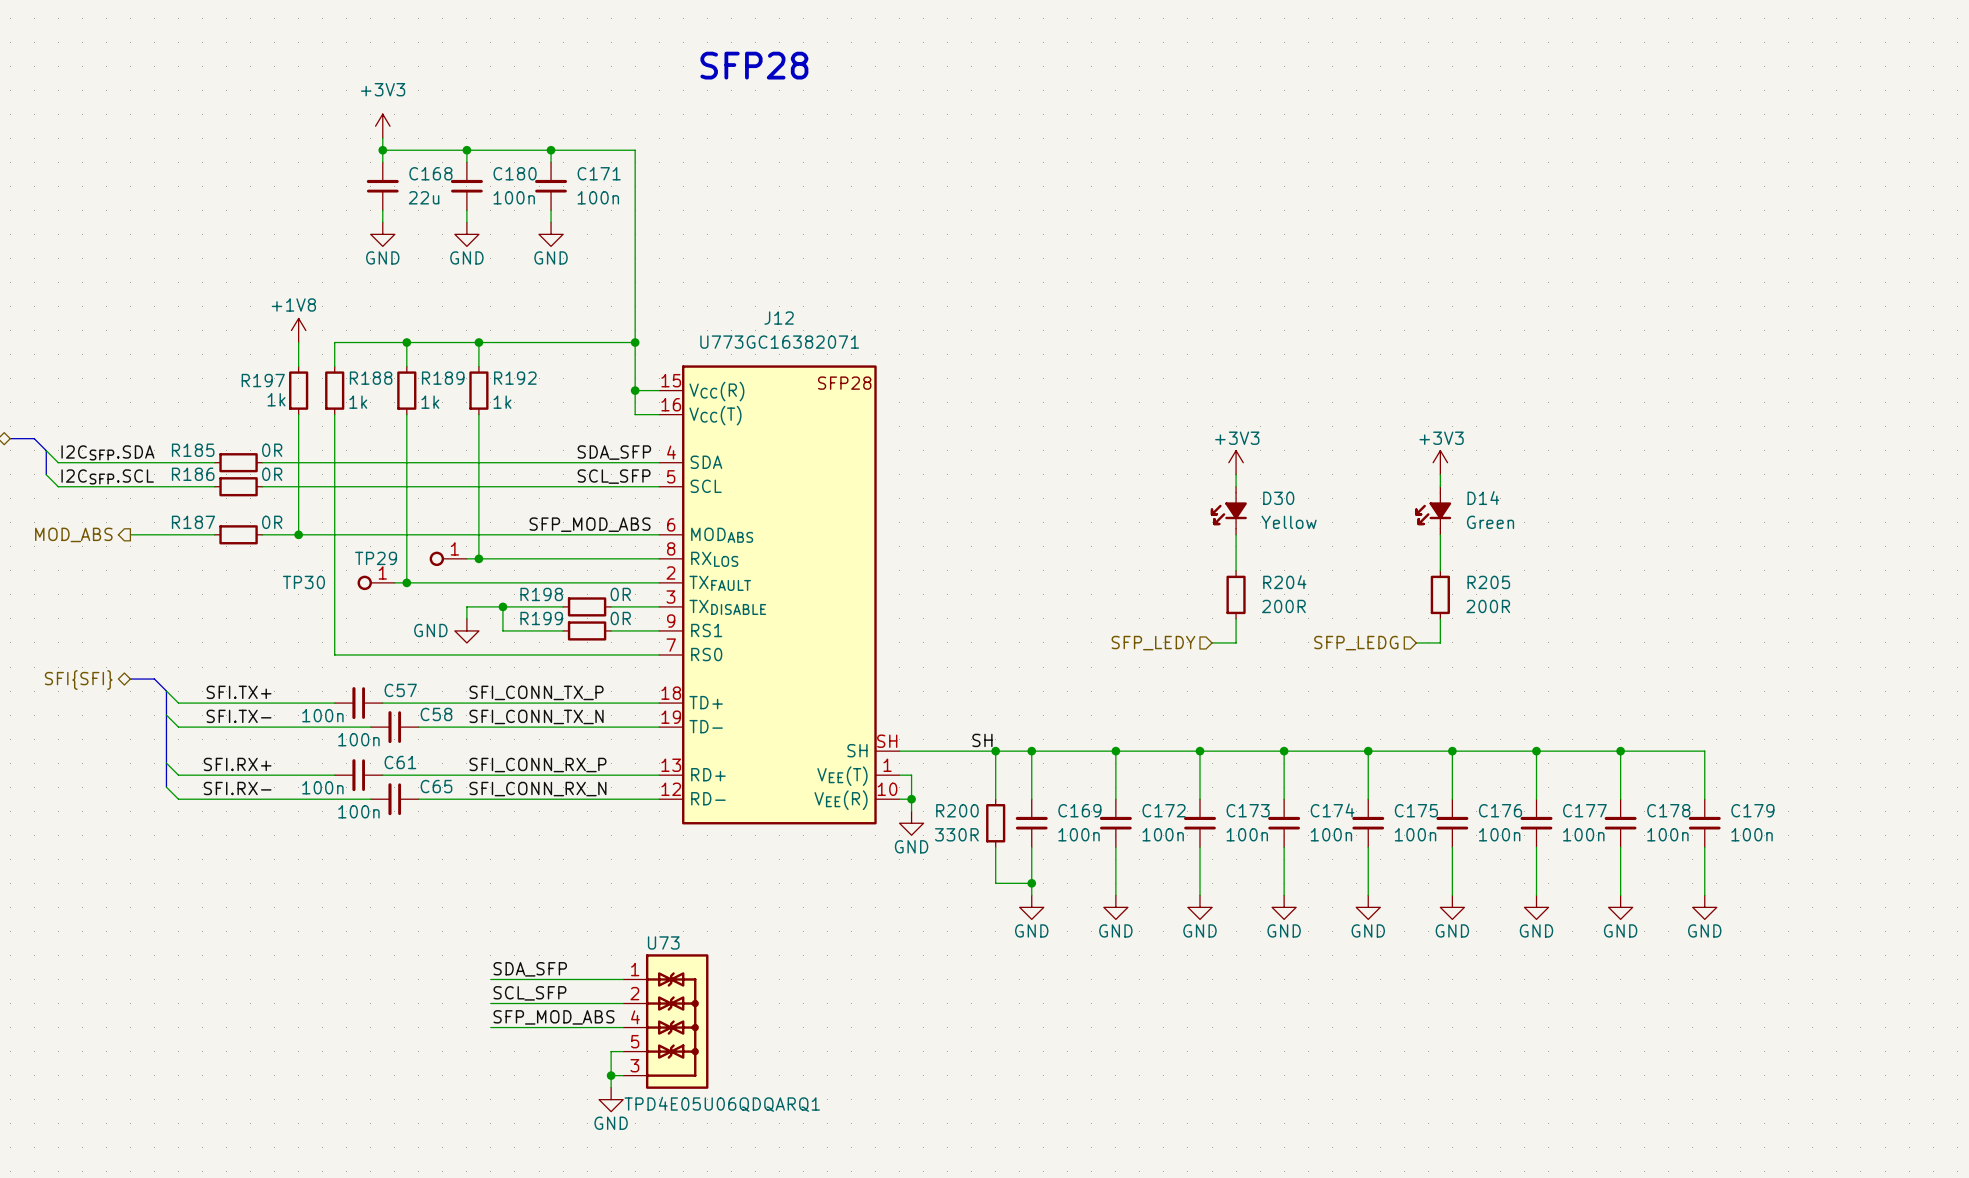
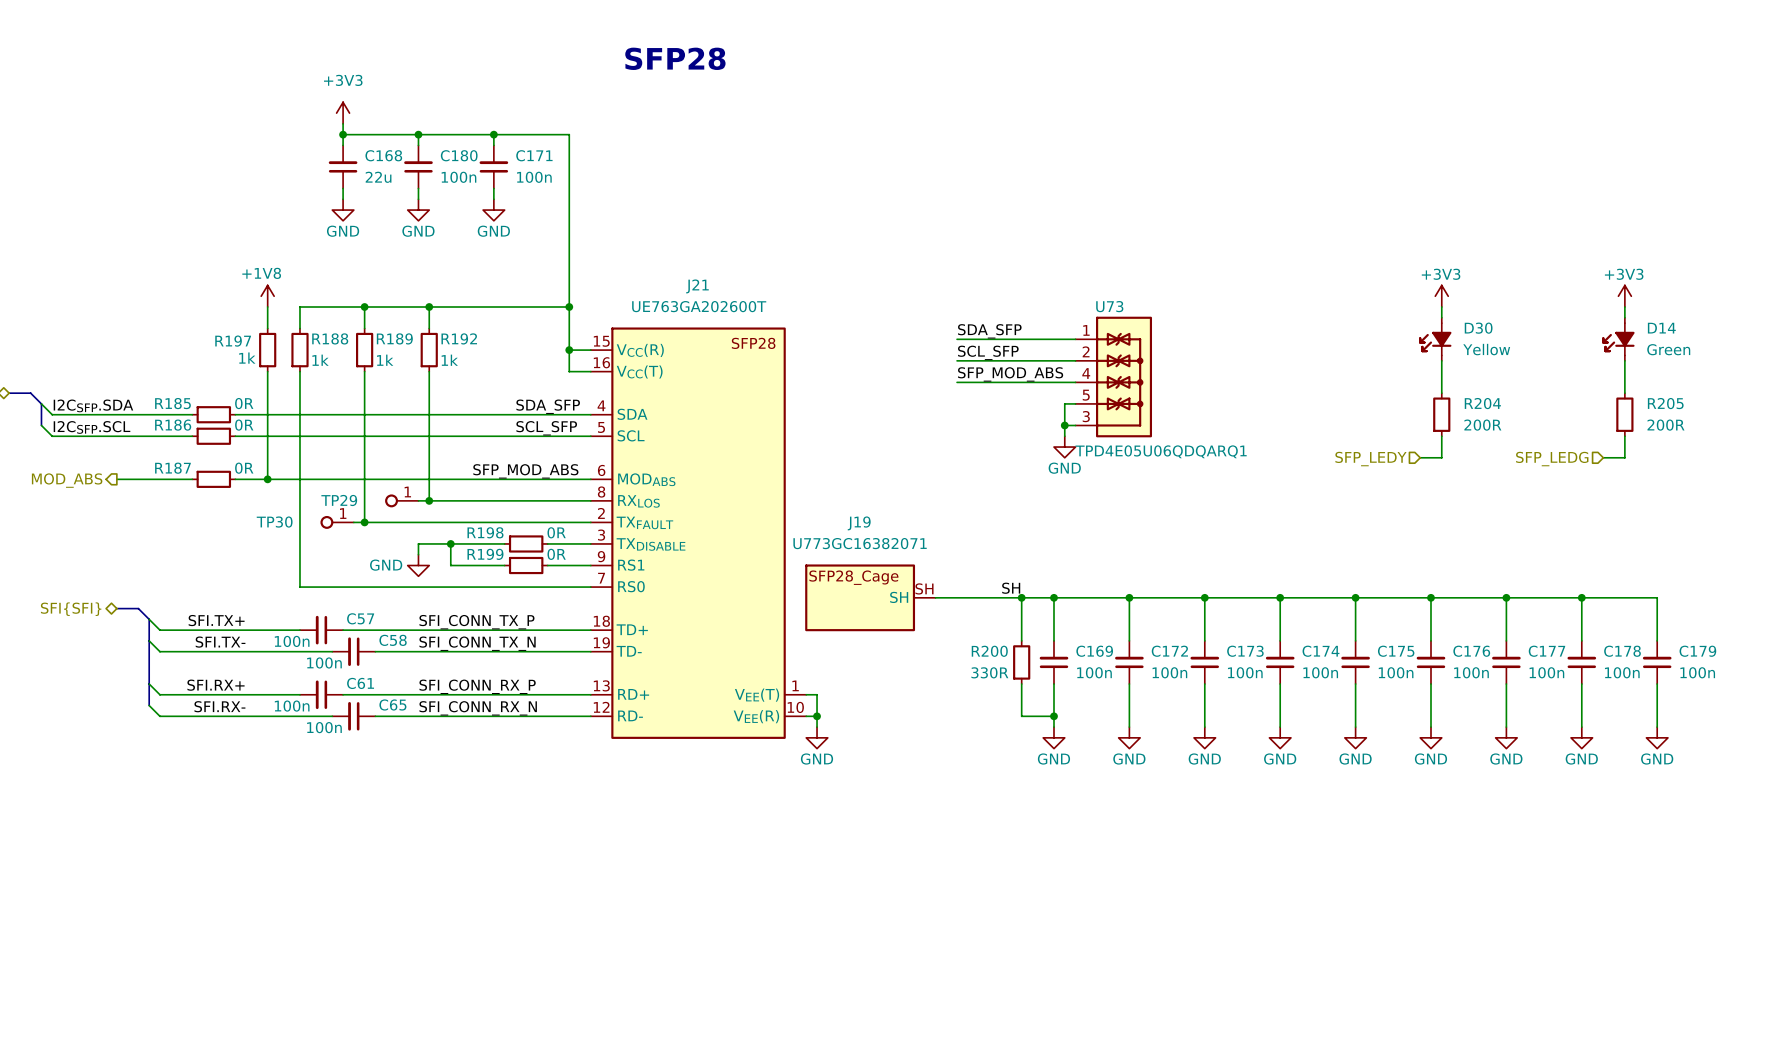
power symbol: none -> +3V3 (1441, 296)
power symbol: none -> +3V3 (1624, 296)
wire: none -> (1624, 307) (1624, 317)
label: none -> SDA_SFP (989, 331)
wire: none -> (957, 339) (1075, 339)
label: none -> SCL_SFP (988, 352)
wire: none -> (957, 360) (1075, 360)
wire: none -> (1624, 360) (1624, 393)
label: none -> SFP_MOD_ABS (1010, 374)
wire: none -> (957, 382) (1075, 382)
wire: none -> (1075, 403) (1064, 403) (1064, 436)
power symbol: +3V3 (1236, 462) -> none
power symbol: +3V3 (1440, 462) -> none
wire: none -> (1064, 425) (1075, 425)
junction: none -> (1064, 425)
wire: (1440, 474) (1440, 486) -> (1441, 307) (1441, 317)
wire: none -> (1624, 436) (1624, 457) (1603, 457)
power symbol: none -> GND (1064, 447)
D30 position: (1228, 510) -> (1435, 339)
D14 position: (1433, 510) -> (1618, 339)
hierarchical label: none -> SFP_LEDY (1370, 459)
hierarchical label: none -> SFP_LEDG (1552, 459)
wire: (1236, 534) (1236, 570) -> none
wire: (1440, 534) (1440, 570) -> (1441, 360) (1441, 393)
J12: (779, 594) -> none
J21: none -> (698, 533)
R204 position: (1236, 594) -> (1441, 414)
R205 position: (1440, 594) -> (1624, 414)
wire: (1236, 618) (1236, 642) (1212, 642) -> none
wire: (1440, 618) (1440, 642) (1416, 642) -> (1441, 436) (1441, 457) (1420, 457)
hierarchical label: SFP_LEDY (1153, 643) -> none
hierarchical label: SFP_LEDG (1356, 643) -> none
J19: none -> (870, 597)
junction: none -> (1021, 597)
junction: none -> (1053, 597)
junction: none -> (1129, 597)
junction: none -> (1204, 597)
junction: none -> (1280, 597)
junction: none -> (1355, 597)
junction: none -> (1430, 597)
junction: none -> (1506, 597)
junction: none -> (1581, 597)
label position: SH (982, 740) -> SH (1011, 588)
wire: (899, 751) (1704, 751) (1704, 799) -> (935, 597) (1657, 597) (1657, 640)
wire: (995, 751) (995, 799) -> (1021, 597) (1021, 640)
junction: (995, 751) -> none
wire: (1031, 751) (1031, 799) -> (1053, 597) (1053, 640)
junction: (1031, 751) -> none
wire: (1115, 751) (1115, 799) -> (1129, 597) (1129, 640)
junction: (1115, 751) -> none
wire: (1200, 751) (1200, 799) -> (1204, 597) (1204, 640)
junction: (1200, 751) -> none
wire: (1284, 751) (1284, 799) -> (1280, 597) (1280, 640)
junction: (1284, 751) -> none
wire: (1368, 751) (1368, 799) -> (1355, 597) (1355, 640)
junction: (1368, 751) -> none
wire: (1452, 751) (1452, 799) -> (1430, 597) (1430, 640)
junction: (1452, 751) -> none
wire: (1536, 751) (1536, 799) -> (1506, 597) (1506, 640)
junction: (1536, 751) -> none
wire: (1620, 751) (1620, 799) -> (1581, 597) (1581, 640)
junction: (1620, 751) -> none
junction: none -> (1053, 716)
R200 position: (995, 823) -> (1021, 662)
C169 position: (1031, 823) -> (1053, 662)
C172 position: (1115, 823) -> (1129, 662)
power symbol: none -> GND (1053, 737)
C173 position: (1200, 823) -> (1204, 662)
power symbol: none -> GND (1129, 737)
C174 position: (1284, 823) -> (1280, 662)
power symbol: none -> GND (1204, 737)
C175 position: (1368, 823) -> (1355, 662)
power symbol: none -> GND (1280, 737)
C176 position: (1452, 823) -> (1430, 662)
power symbol: none -> GND (1355, 737)
C177 position: (1536, 823) -> (1506, 662)
power symbol: none -> GND (1430, 737)
C178 position: (1620, 823) -> (1581, 662)
power symbol: none -> GND (1506, 737)
C179 position: (1704, 823) -> (1657, 662)
power symbol: none -> GND (1581, 737)
power symbol: none -> GND (1657, 737)
wire: (995, 847) (995, 883) (1031, 883) -> (1021, 684) (1021, 716) (1053, 716)
wire: (1031, 847) (1031, 895) -> (1053, 684) (1053, 727)
wire: (1115, 847) (1115, 895) -> (1129, 684) (1129, 727)
wire: (1200, 847) (1200, 895) -> (1204, 684) (1204, 727)
wire: (1284, 847) (1284, 895) -> (1280, 684) (1280, 727)
wire: (1368, 847) (1368, 895) -> (1355, 684) (1355, 727)
wire: (1452, 847) (1452, 895) -> (1430, 684) (1430, 727)
wire: (1536, 847) (1536, 895) -> (1506, 684) (1506, 727)
wire: (1620, 847) (1620, 895) -> (1581, 684) (1581, 727)
wire: (1704, 847) (1704, 895) -> (1657, 684) (1657, 727)
junction: (1031, 883) -> none
power symbol: GND (1031, 907) -> none
power symbol: GND (1115, 907) -> none
power symbol: GND (1200, 907) -> none
power symbol: GND (1284, 907) -> none
power symbol: GND (1368, 907) -> none
power symbol: GND (1452, 907) -> none
power symbol: GND (1536, 907) -> none
power symbol: GND (1620, 907) -> none
power symbol: GND (1704, 907) -> none
label: SDA_SFP (530, 969) -> none
wire: (490, 979) (623, 979) -> none
label: SCL_SFP (529, 993) -> none
wire: (490, 1003) (623, 1003) -> none
label: SFP_MOD_ABS (553, 1017) -> none
U73 position: (665, 1021) -> (1113, 377)
wire: (490, 1027) (623, 1027) -> none
wire: (623, 1051) (611, 1051) (611, 1087) -> none
wire: (611, 1075) (623, 1075) -> none
junction: (611, 1075) -> none
power symbol: GND (611, 1099) -> none

